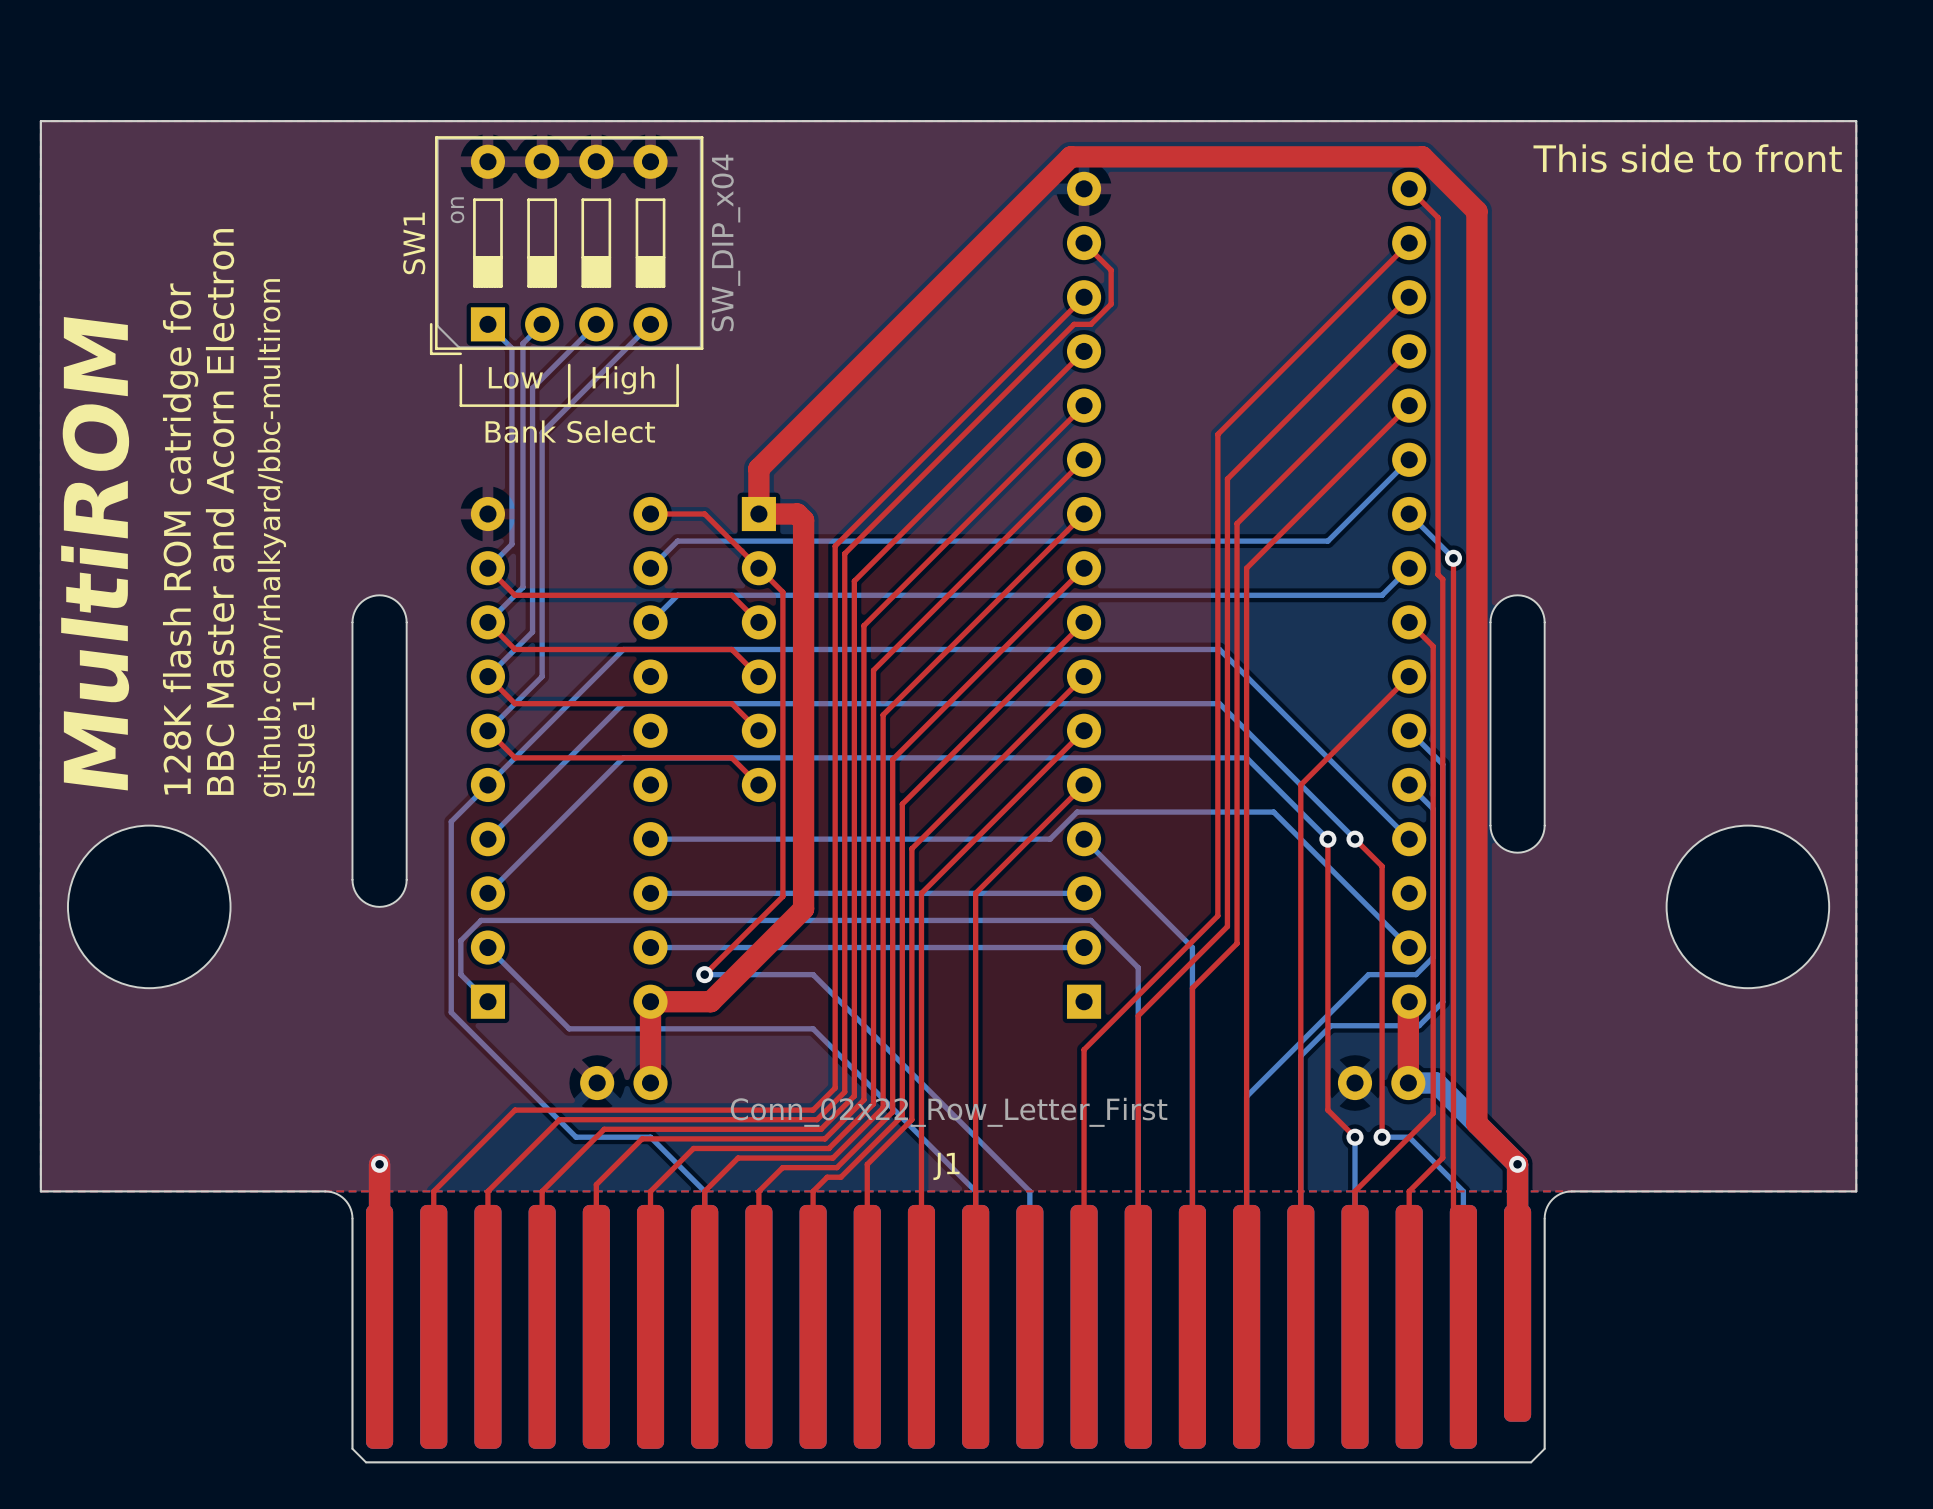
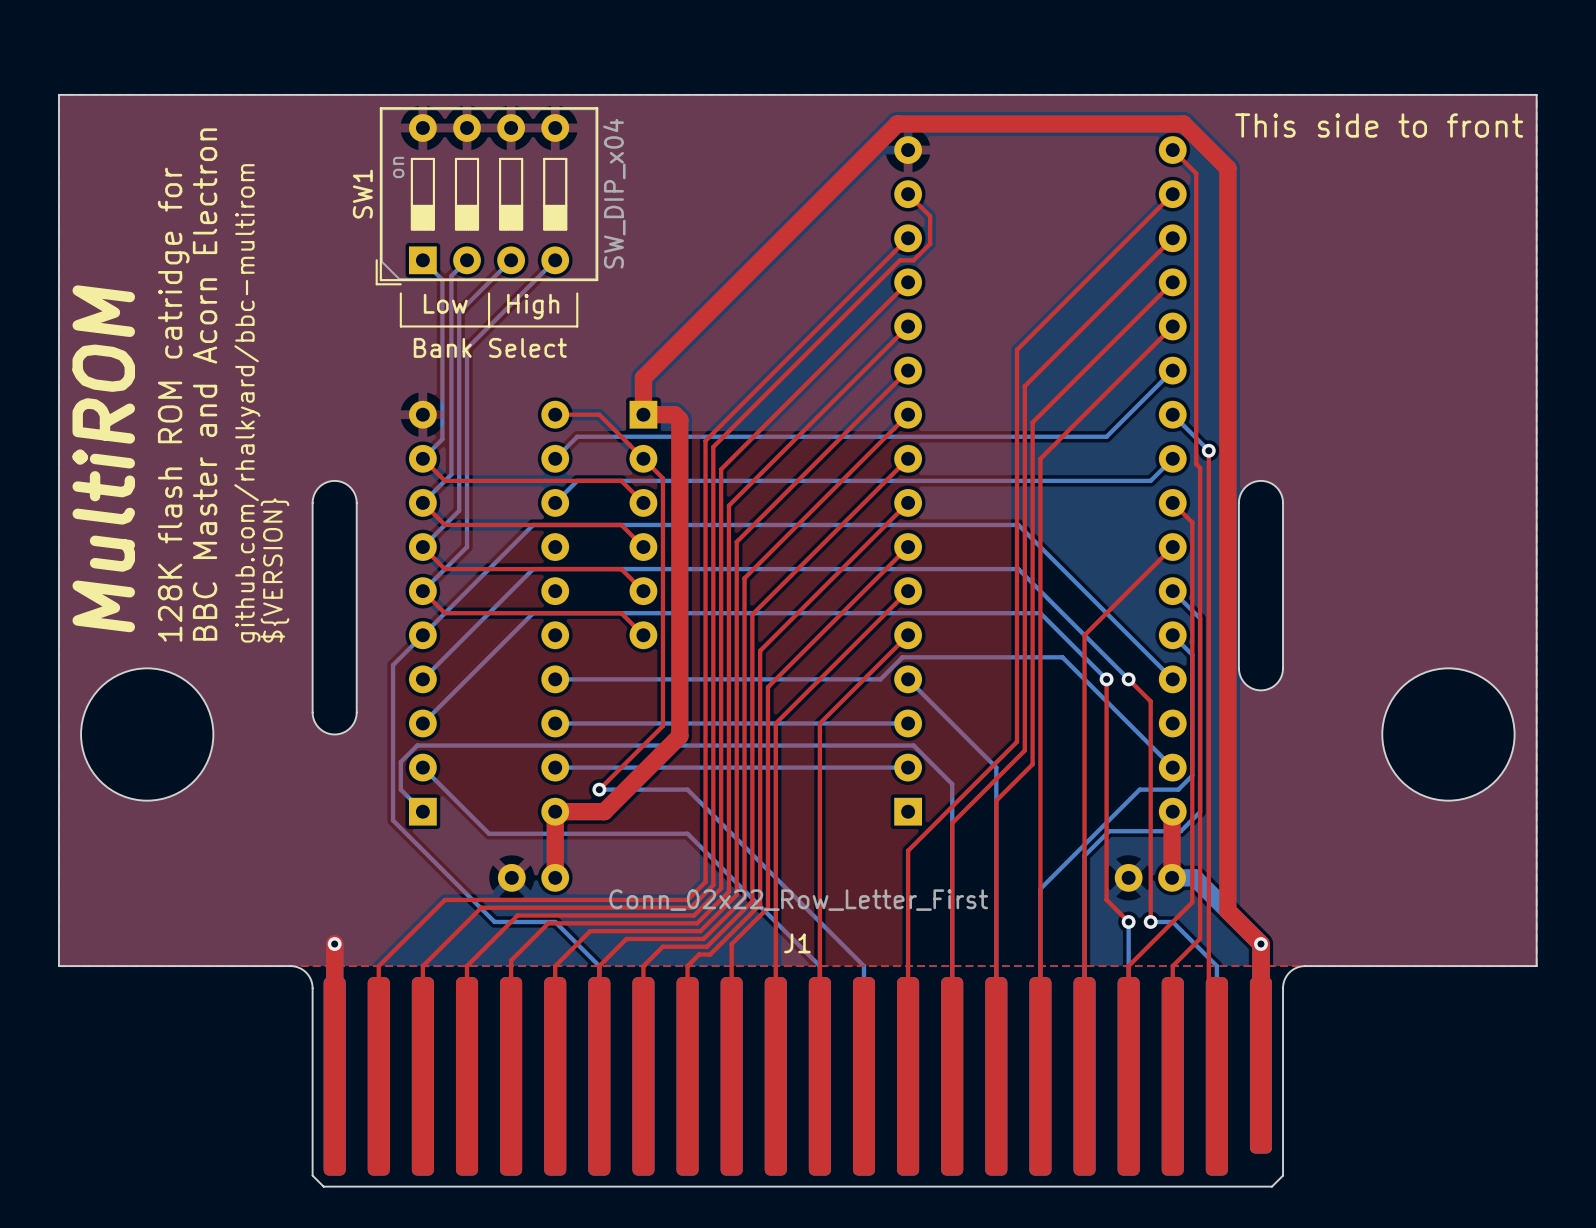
text: Issue 1 (303, 746) -> ${VERSION} (274, 570)

